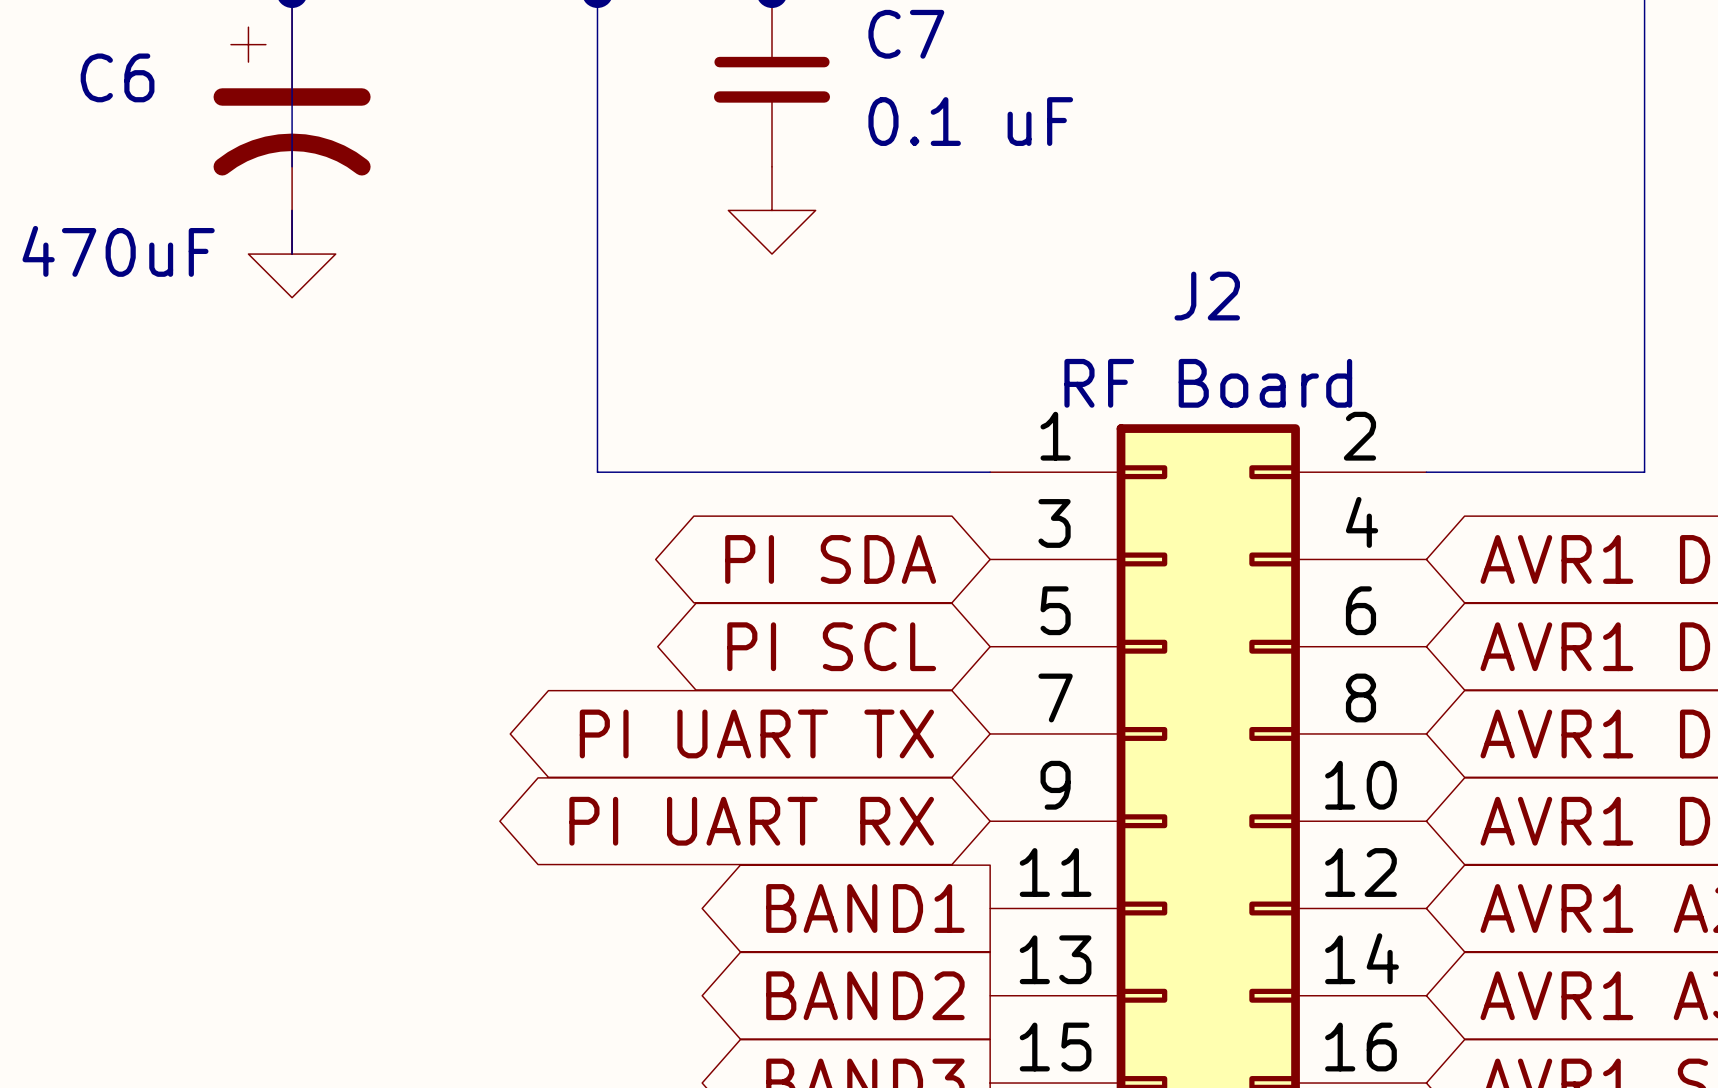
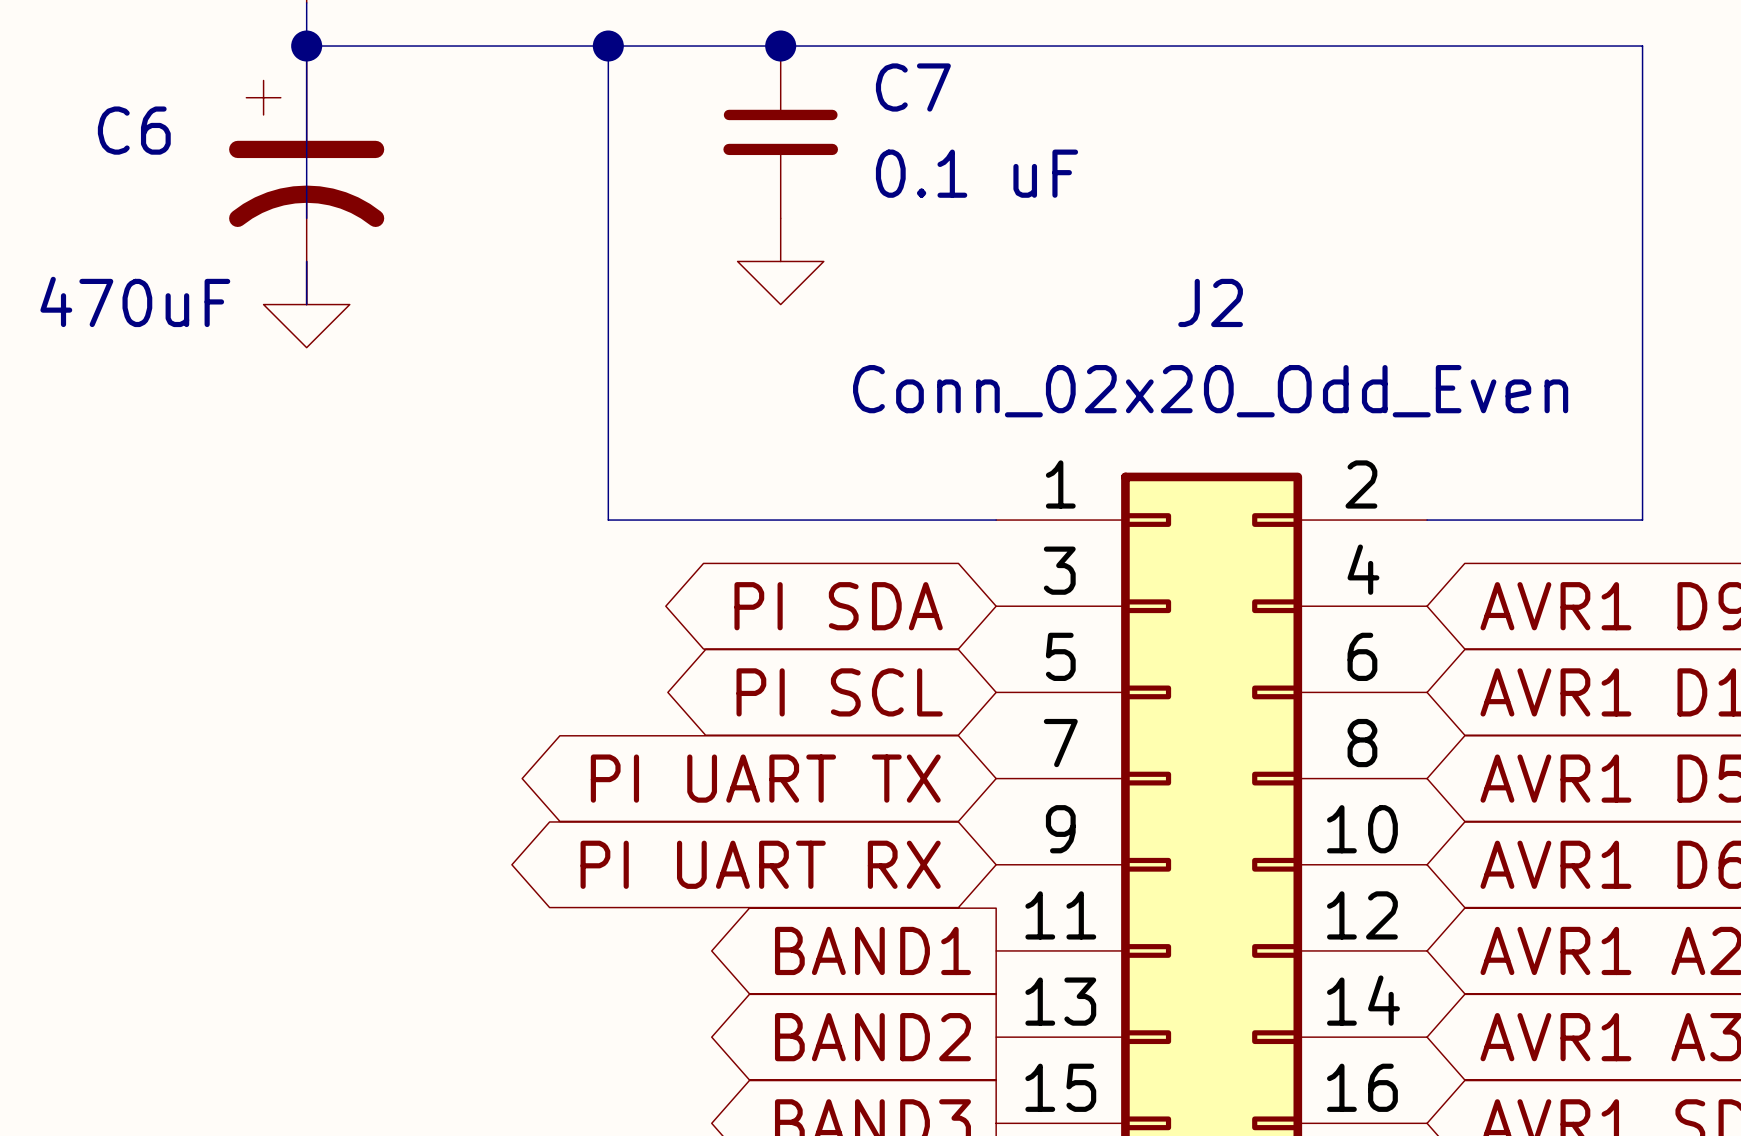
J2 name position: J2 (1207, 296) -> J2 (1210, 302)
J2 value: RF Board (1208, 383) -> Conn_02x20_Odd_Even (1210, 391)

